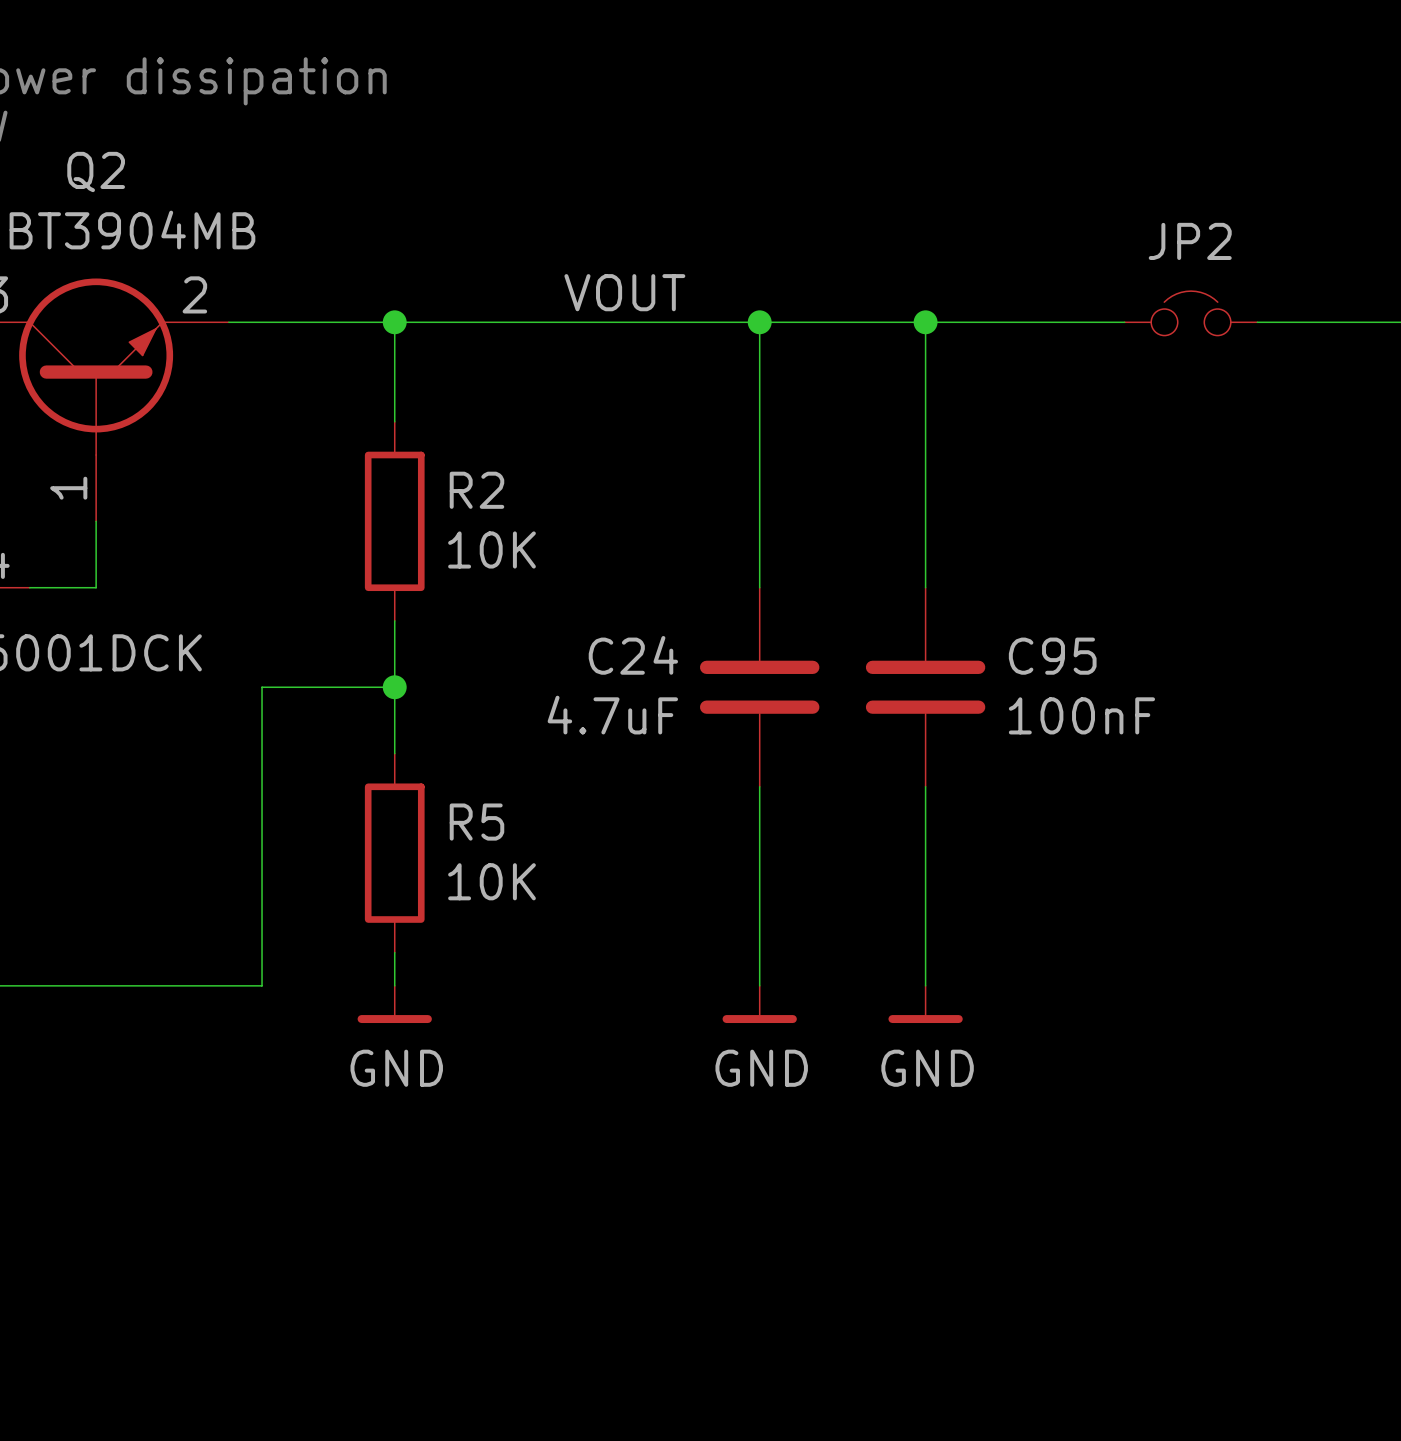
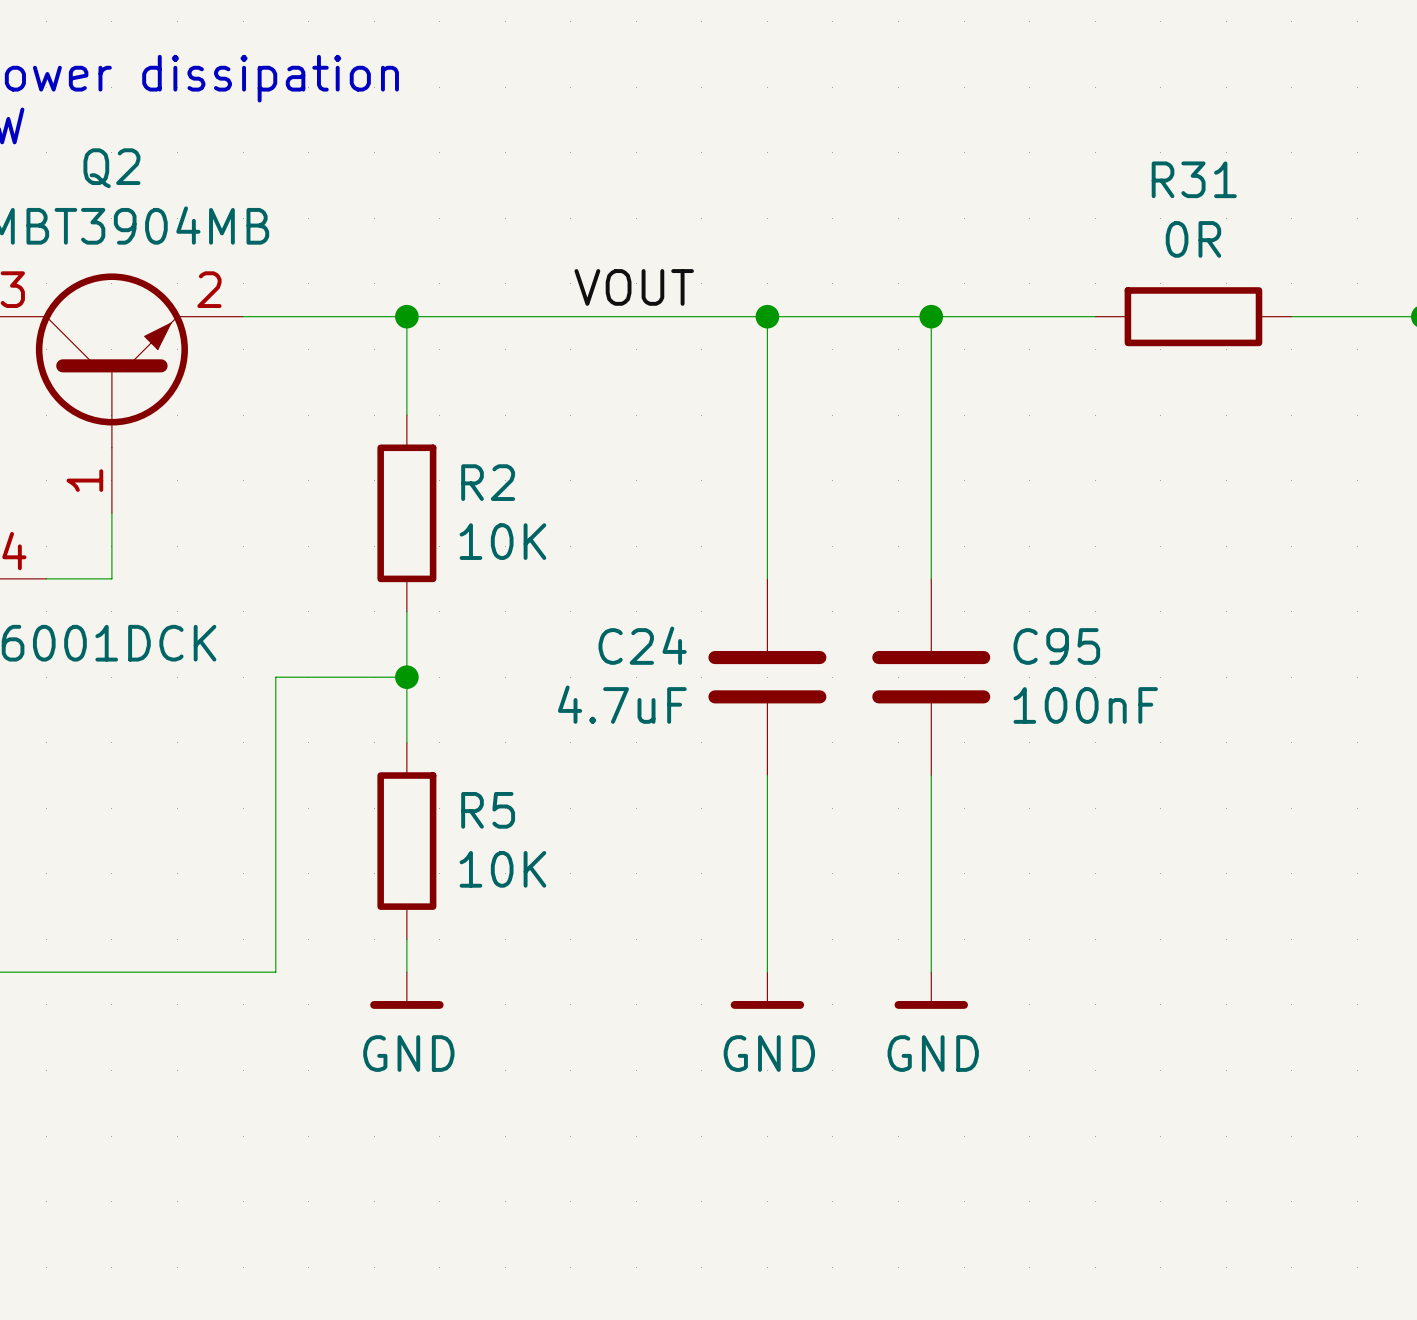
JP2: (1191, 313) -> none
R31: none -> 0R (1193, 316)

